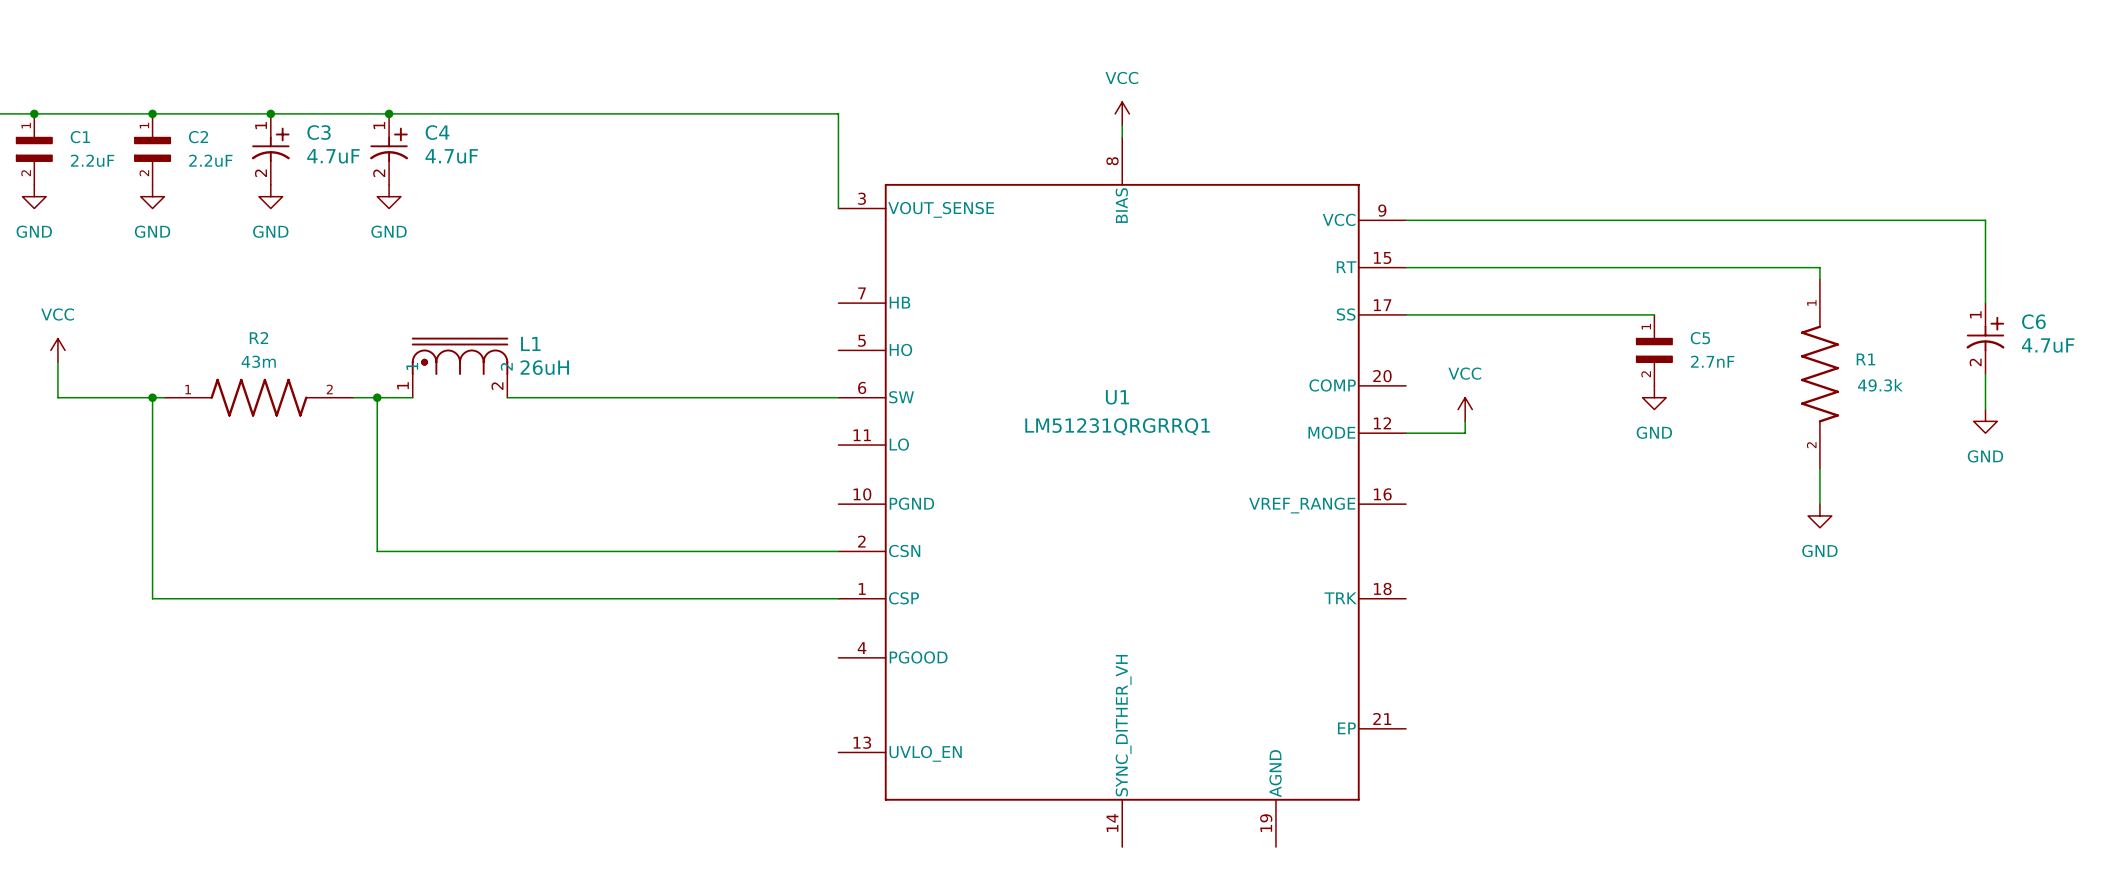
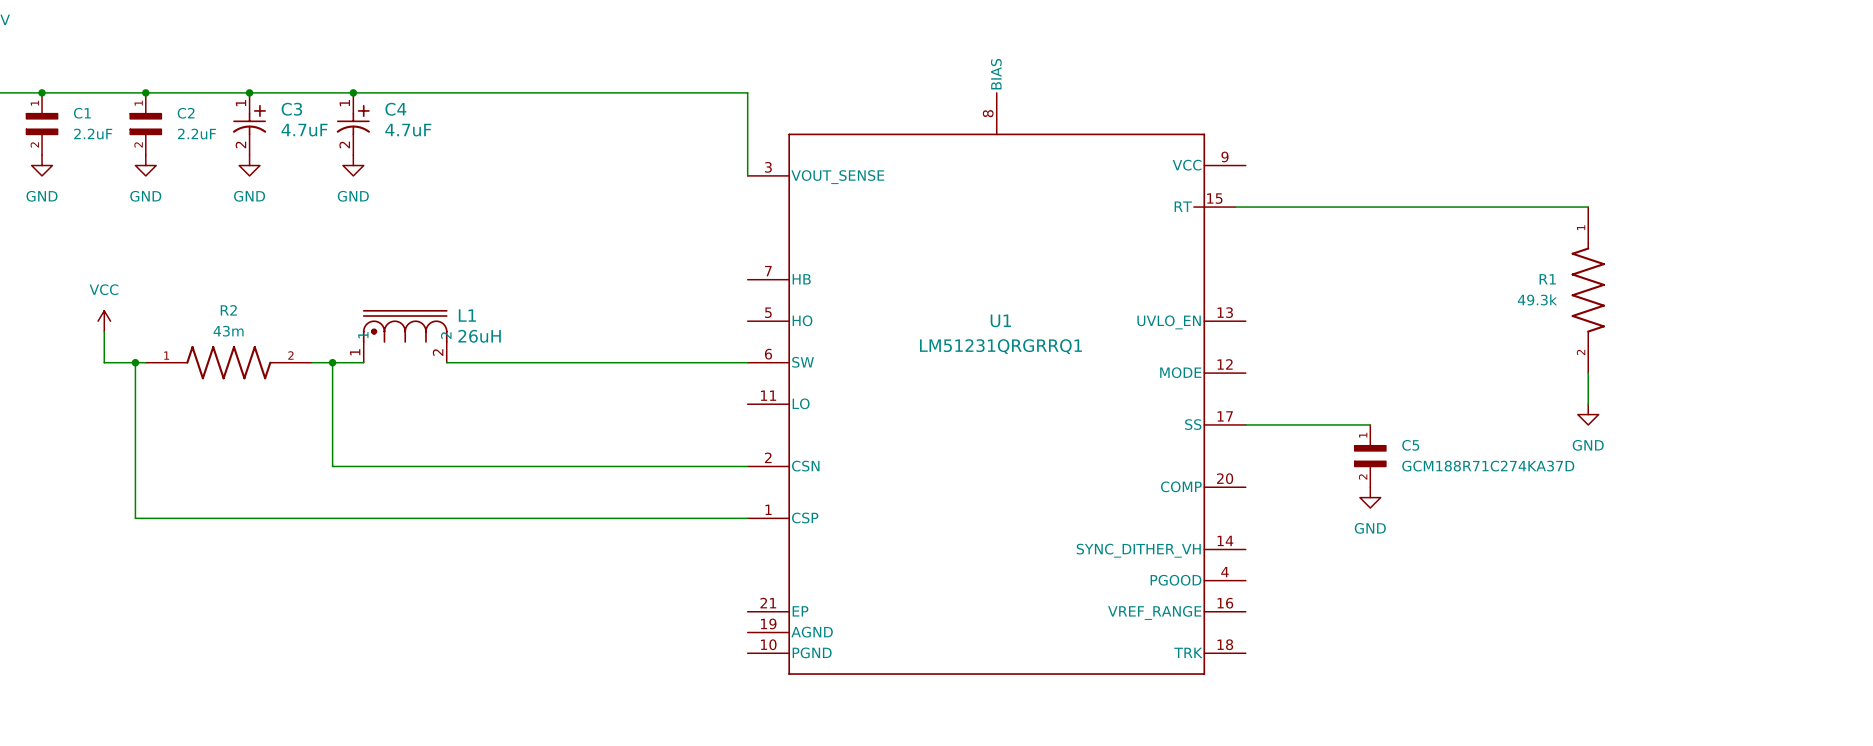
power symbol: VCC (1122, 113) -> none
U1 symbol: [838, 137, 1407, 848] -> [747, 92, 1246, 675]
wire: (1406, 220) (1985, 220) (1985, 303) -> none
wire: none -> (1235, 207) (1588, 207)
wire: (1406, 267) (1819, 267) (1819, 279) -> none
wire: (1406, 314) (1654, 314) -> none
C6: 4.7uF (1985, 338) -> none
power symbol position: VCC (57, 350) -> VCC (104, 321)
C5 position: (1654, 350) -> (1370, 456)
R1 name position: R1 (1865, 359) -> R1 (1547, 279)
C5 value: 2.7nF (1712, 361) -> GCM188R71C274KA37D (1488, 466)
wire: (57, 362) (57, 397) (164, 397) -> none
L1 position: (460, 367) -> (405, 336)
R1 position: (1819, 374) -> (1588, 290)
wire: (1985, 374) (1985, 409) -> none
wire: none -> (104, 331) (104, 362) (145, 362)
R1 value position: 49.3k (1880, 385) -> 49.3k (1537, 299)
wire: (152, 397) (152, 598) -> (135, 362) (135, 518) (145, 518)
junction position: (152, 397) -> (135, 362)
R2 position: (258, 397) -> (228, 362)
wire: (353, 397) (412, 397) -> (311, 362) (363, 362)
wire: (377, 397) (377, 551) (838, 551) -> none
junction position: (377, 397) -> (332, 362)
wire: (507, 397) (838, 397) -> none
U1 name position: U1 (1117, 397) -> U1 (1000, 320)
power symbol: GND (1654, 397) -> none
power symbol: VCC (1465, 409) -> none
wire: none -> (332, 362) (332, 466) (747, 466)
wire: none -> (446, 362) (747, 362)
wire: (1465, 421) (1465, 433) (1406, 433) -> none
power symbol: GND (1985, 421) -> none
U1 value position: LM51231QRGRRQ1 (1117, 426) -> LM51231QRGRRQ1 (1000, 346)
wire: (1819, 468) (1819, 504) -> (1588, 373) (1588, 404)
wire: none -> (1245, 424) (1370, 424)
power symbol position: GND (1819, 515) -> GND (1588, 414)
power symbol: none -> GND (1370, 497)

